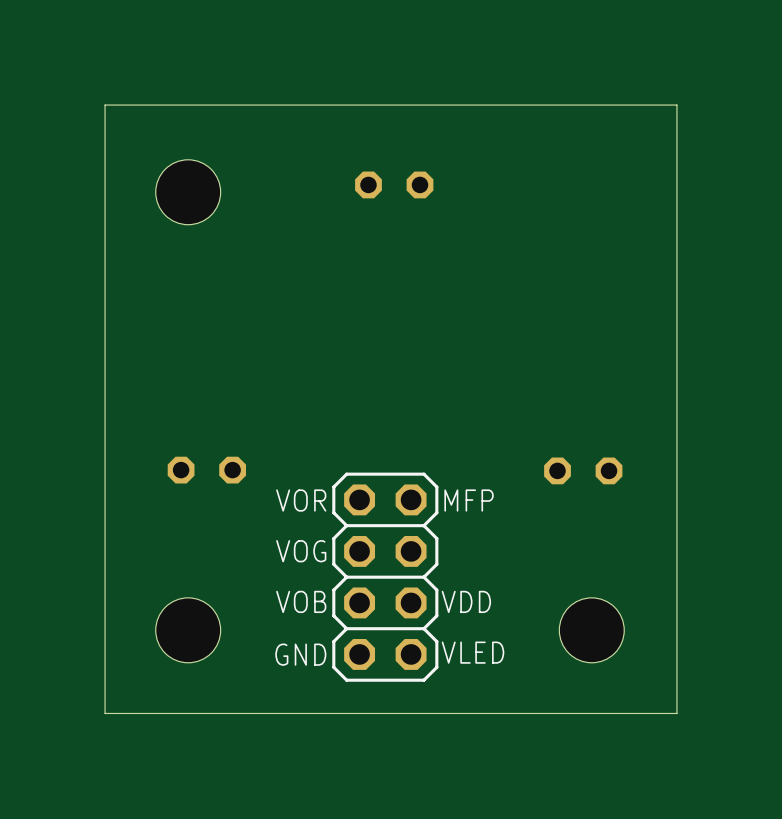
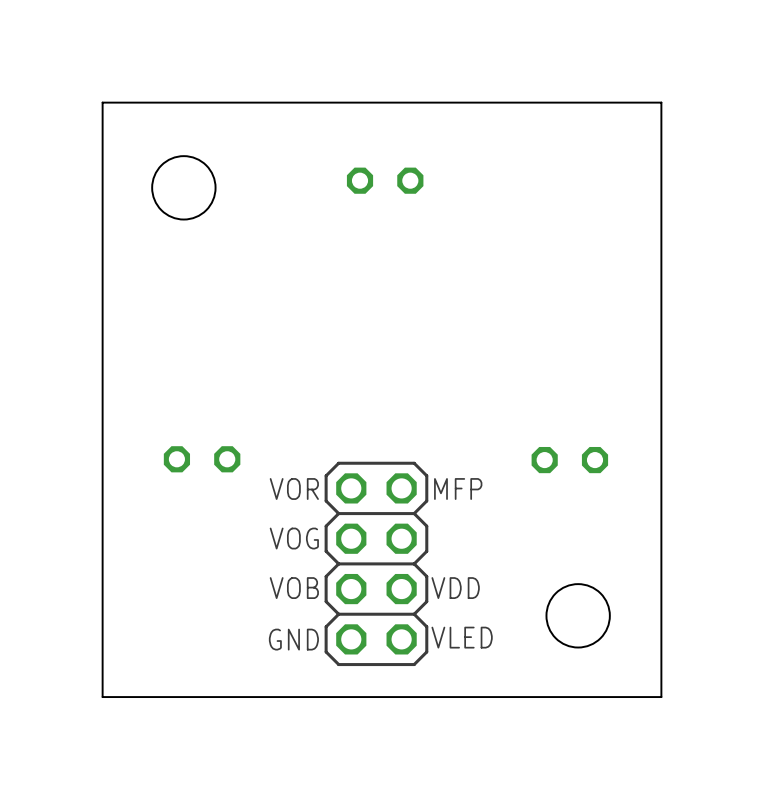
part: (188, 630) -> none

